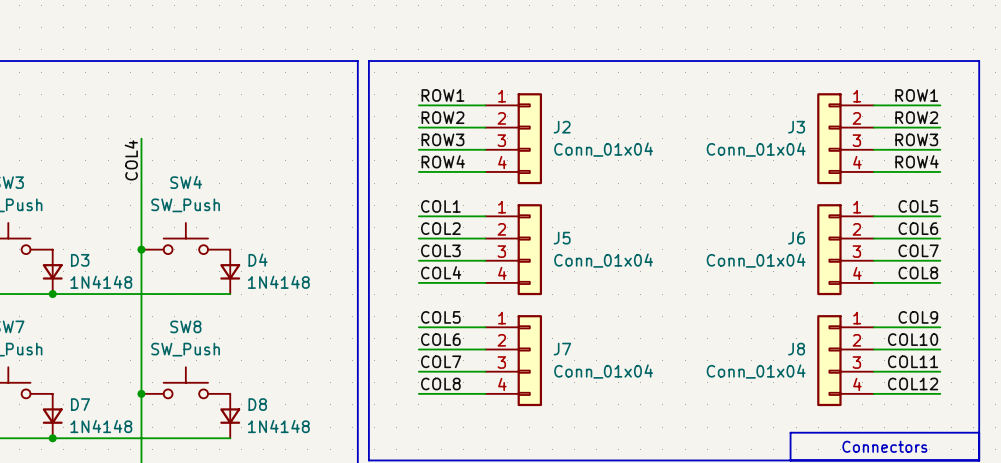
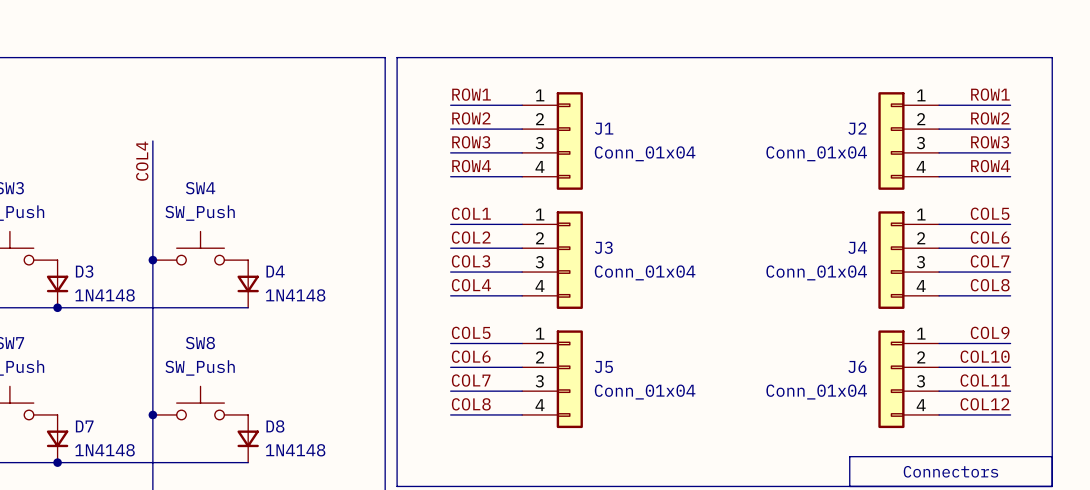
J2 name: J2 (562, 127) -> J1 (604, 128)
J3 name: J3 (796, 127) -> J2 (857, 128)
J5 name: J5 (562, 238) -> J3 (603, 247)
J6 name: J6 (796, 238) -> J4 (857, 247)
J7 name: J7 (562, 349) -> J5 (603, 366)
J8 name: J8 (796, 349) -> J6 (857, 366)

